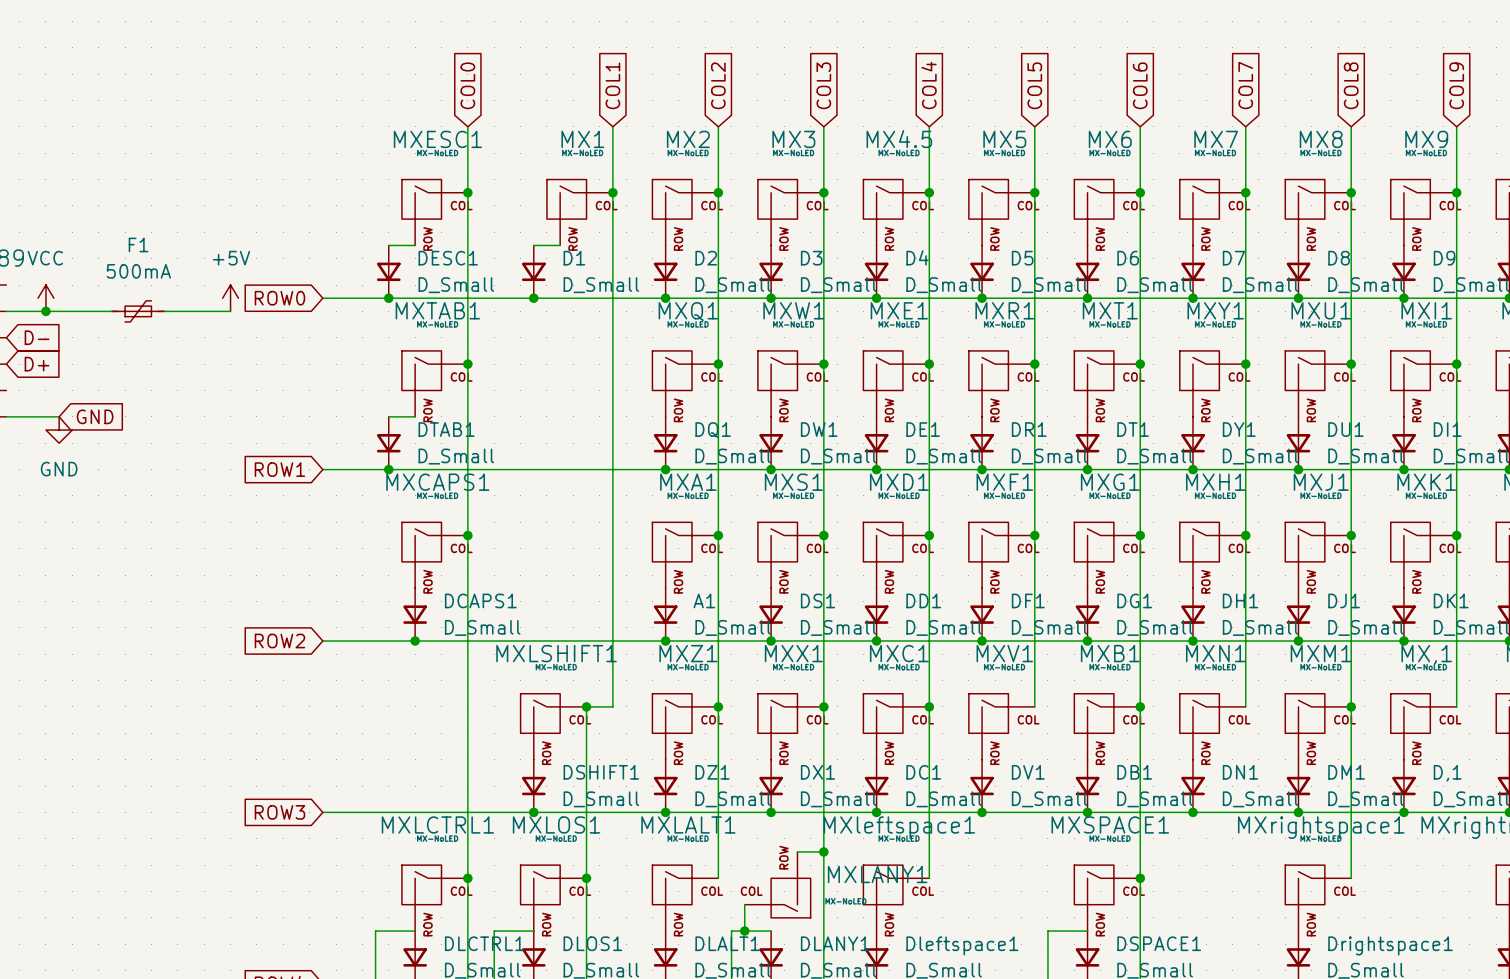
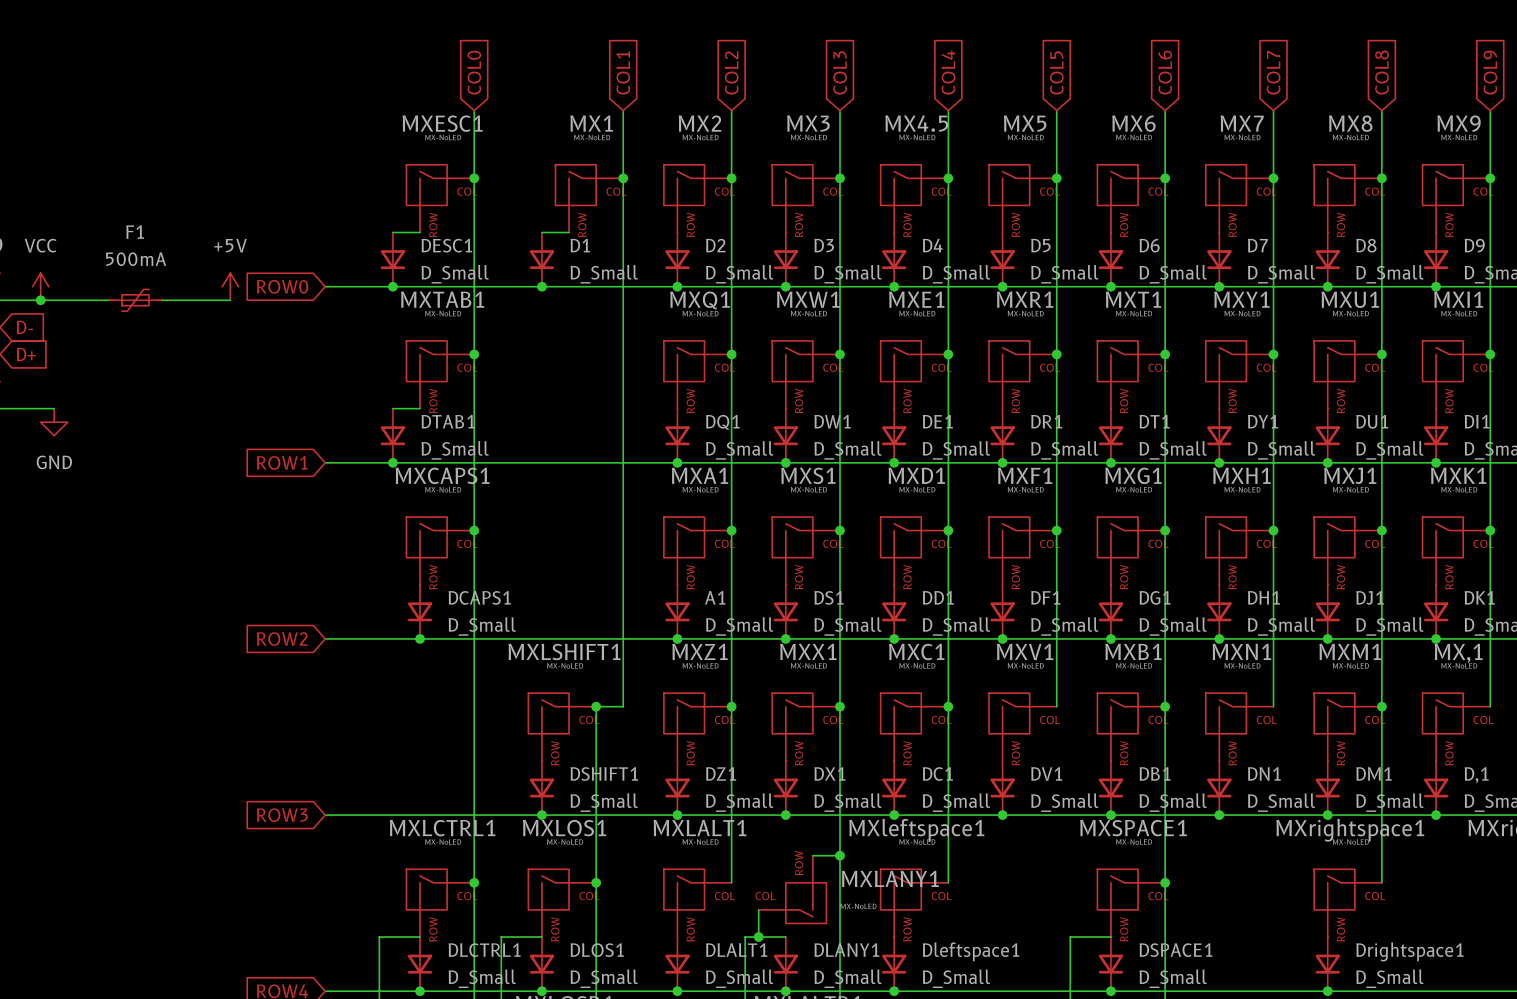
global label: GND (95, 416) -> none

